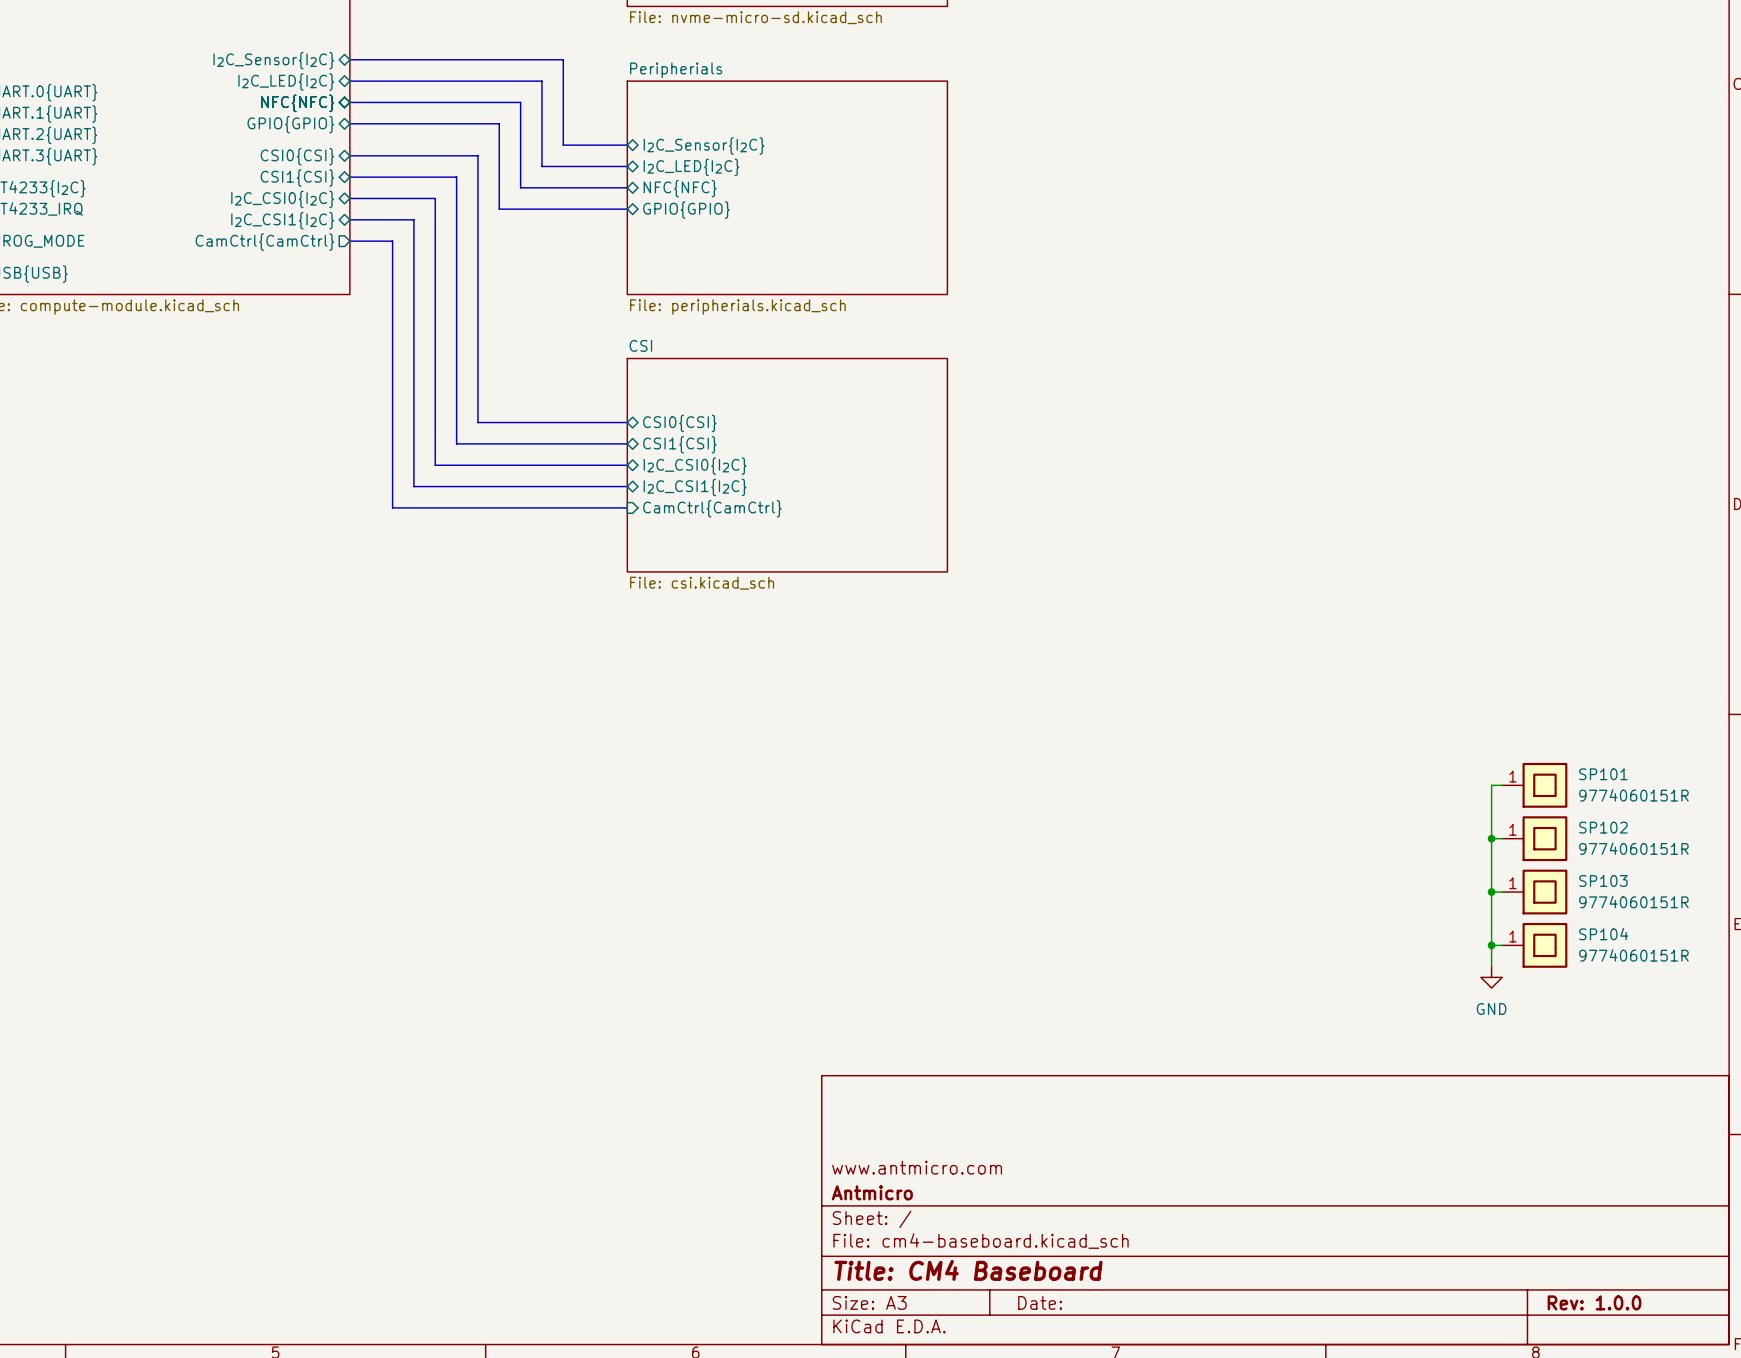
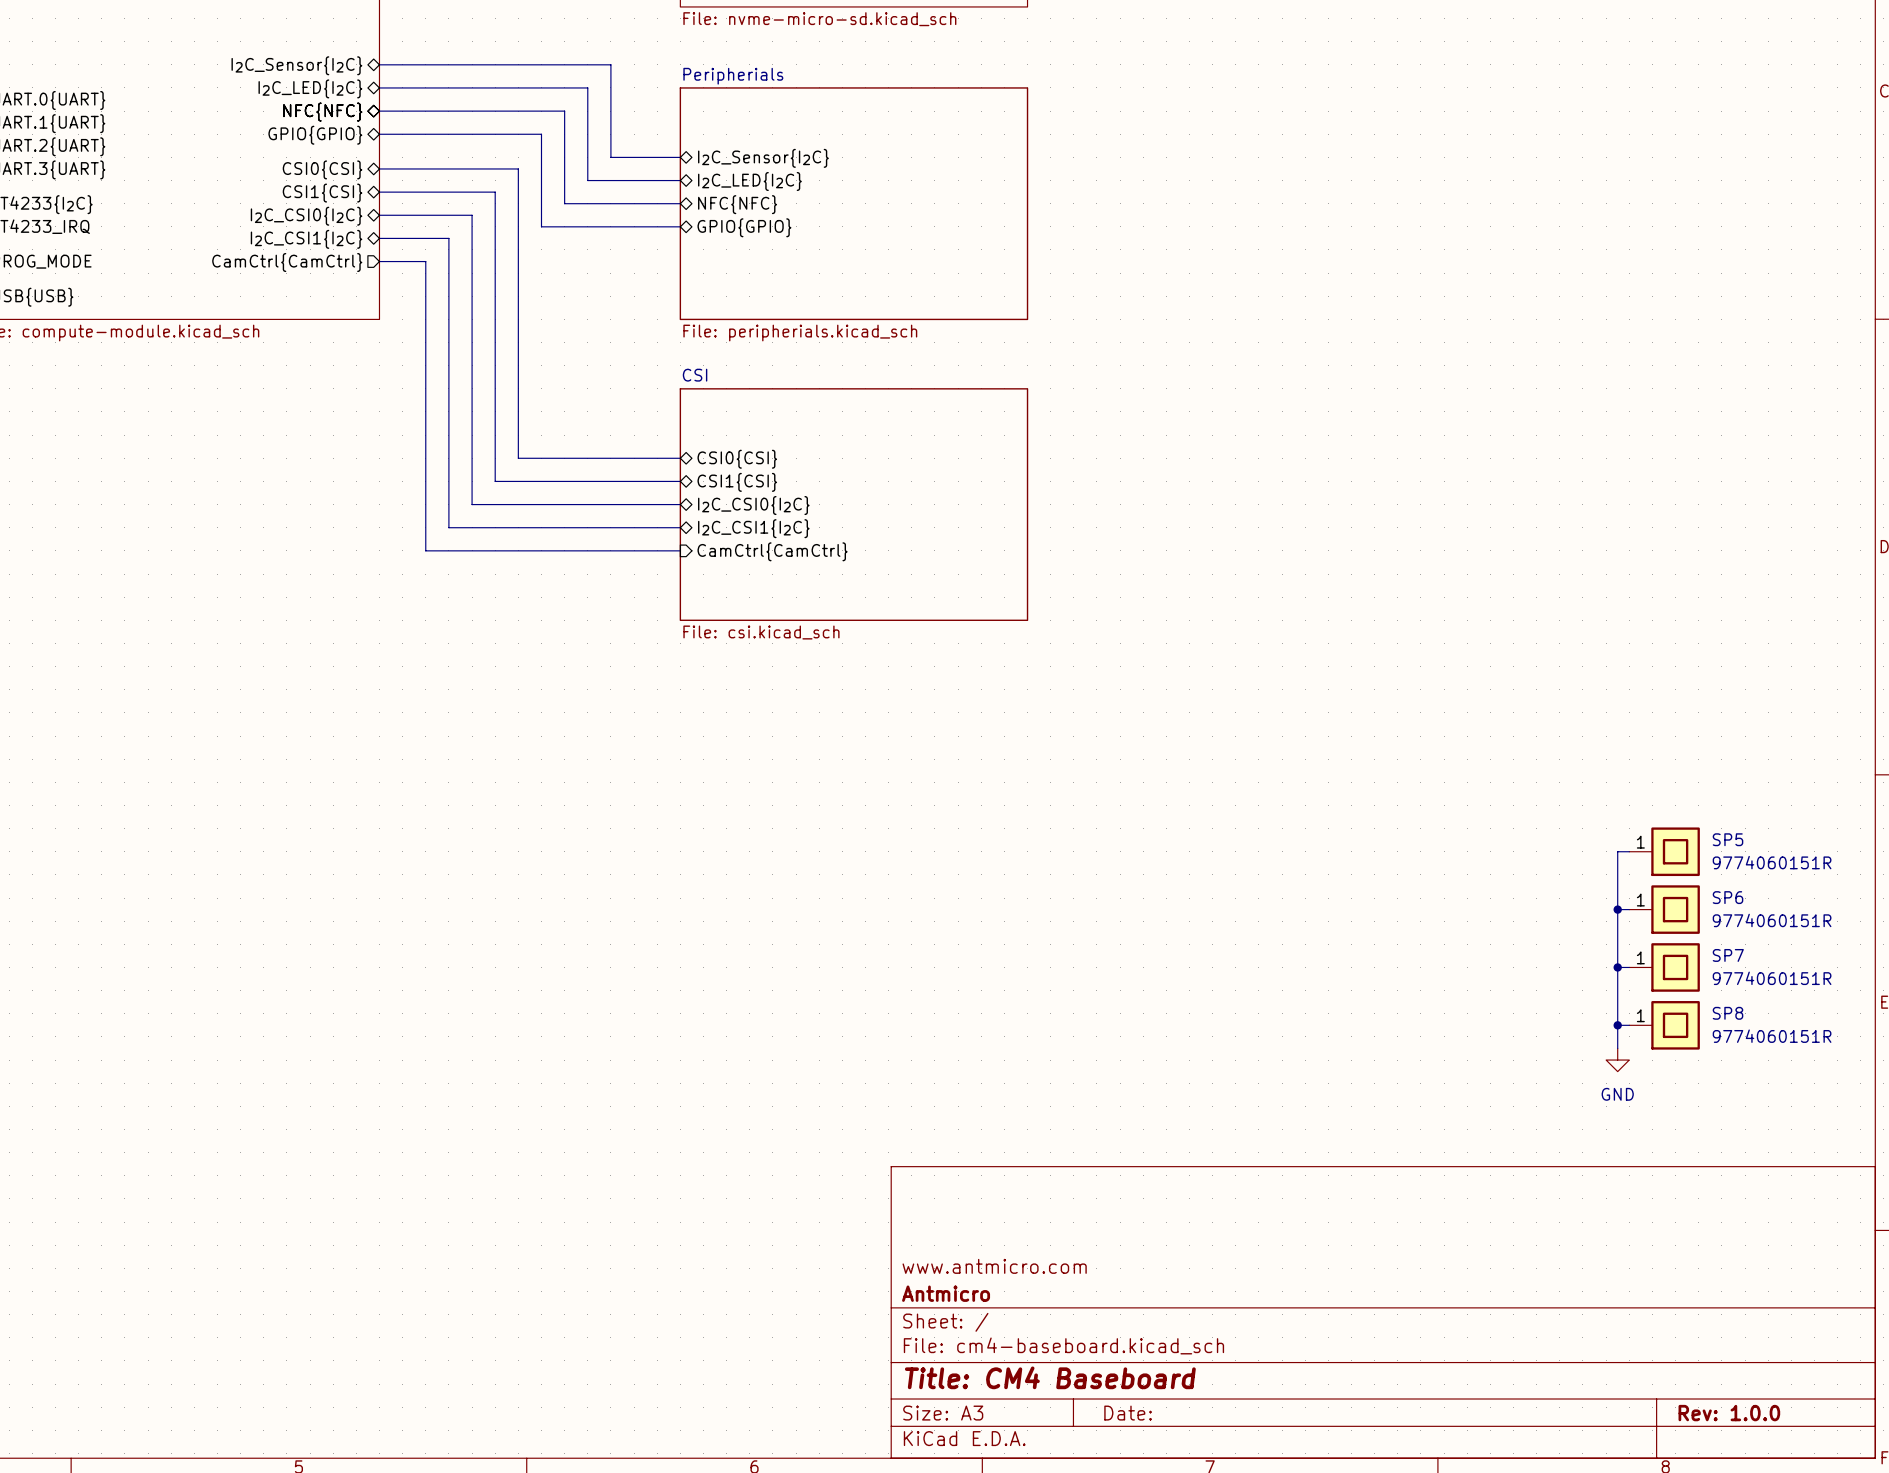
SP101 name: SP101 (1603, 774) -> SP5 (1728, 839)
SP102 name: SP102 (1603, 827) -> SP6 (1728, 897)
SP103 name: SP103 (1603, 880) -> SP7 (1728, 955)
SP104 name: SP104 (1603, 934) -> SP8 (1728, 1013)

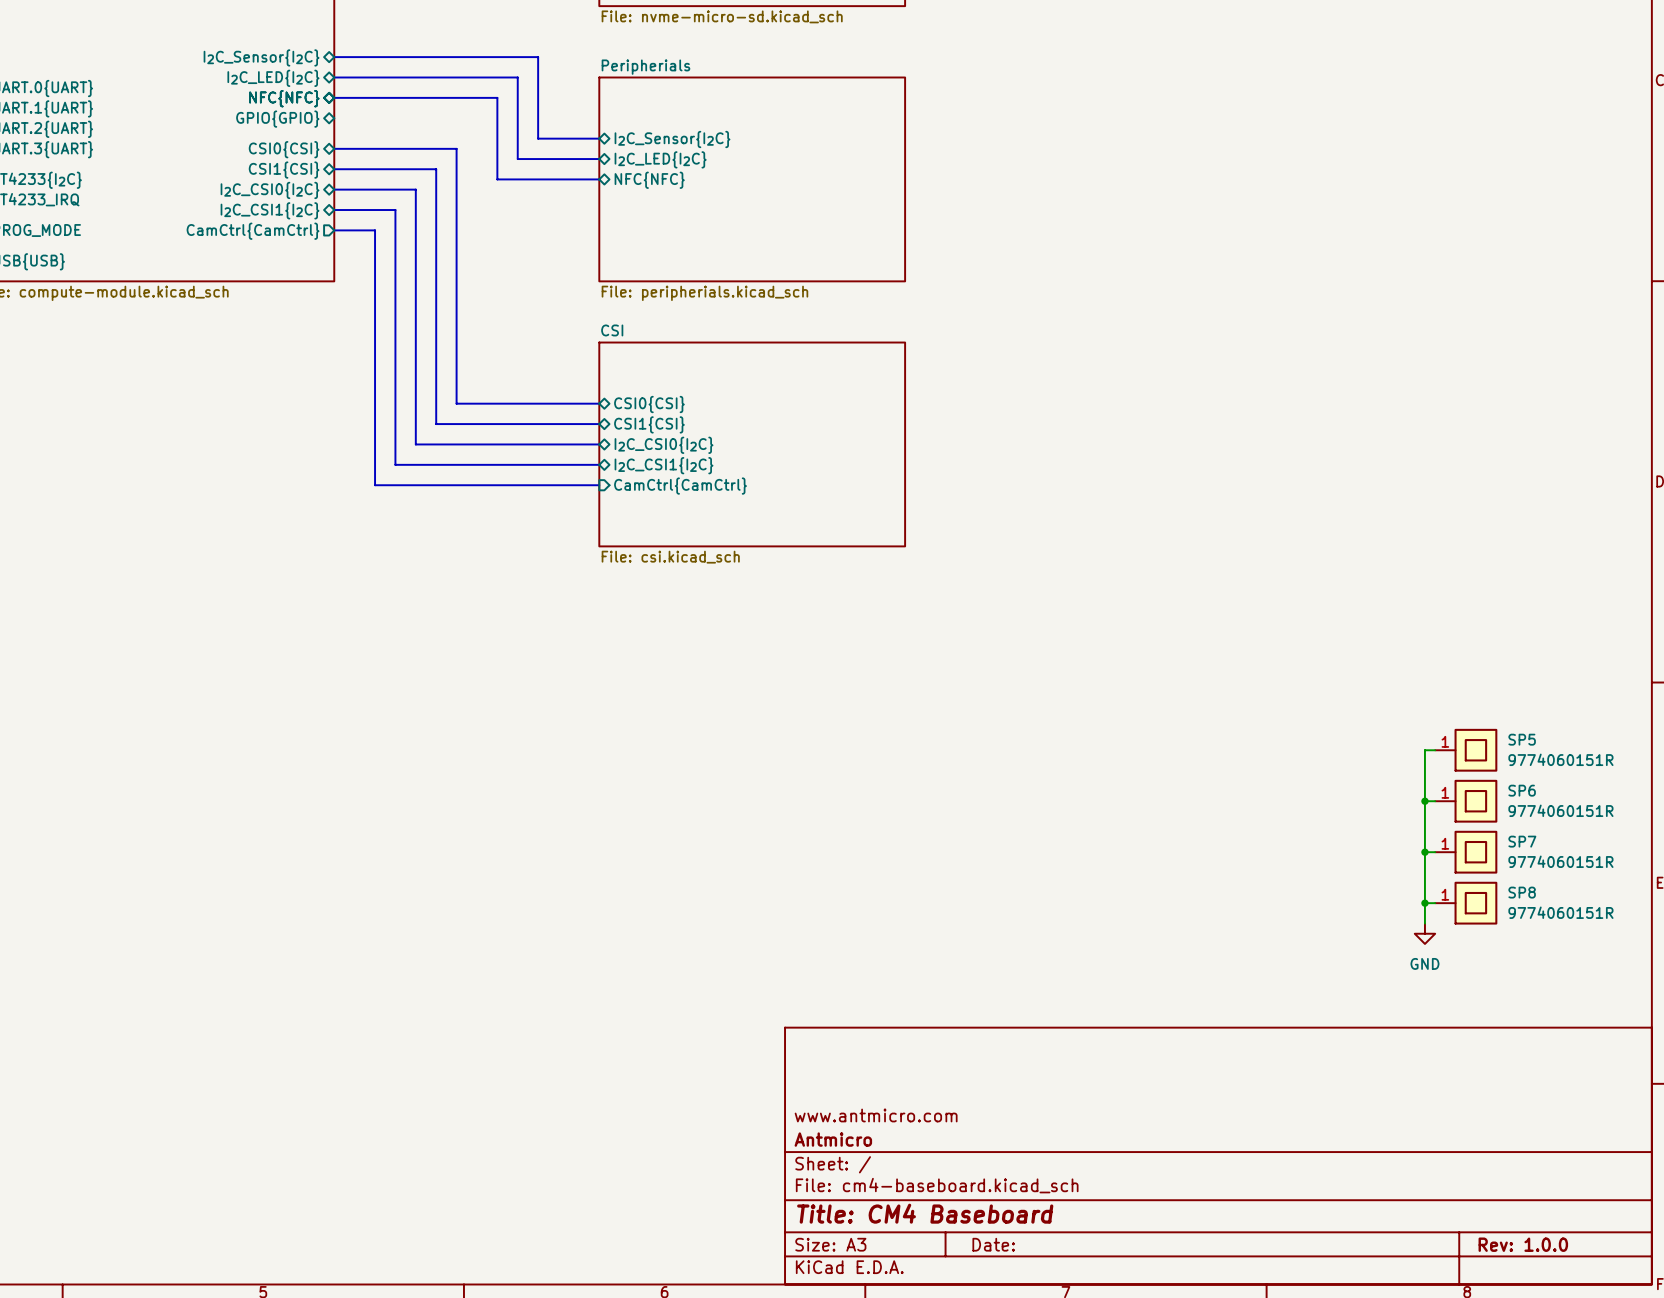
bus: (379, 134) (541, 134) (541, 226) (680, 226) -> none
sheet pin: GPIO{GPIO} (744, 227) -> none

